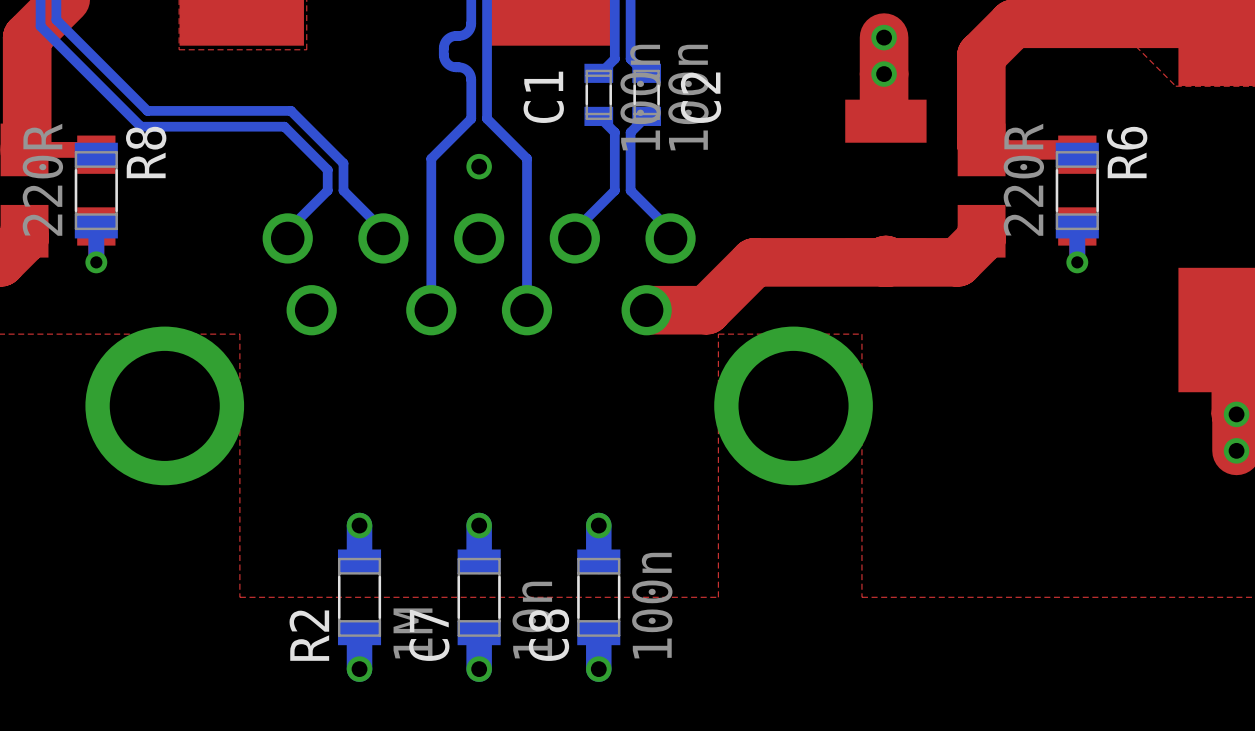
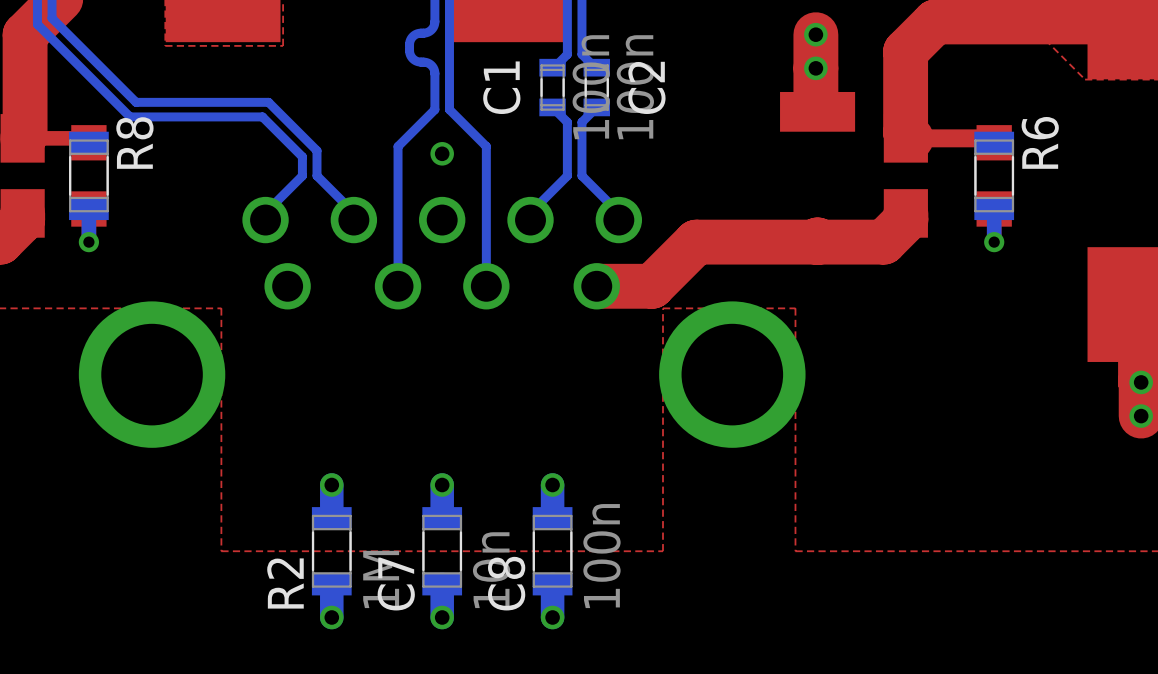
R8 value: 220R (42, 179) -> none
R6 value: 220R (1023, 179) -> none

